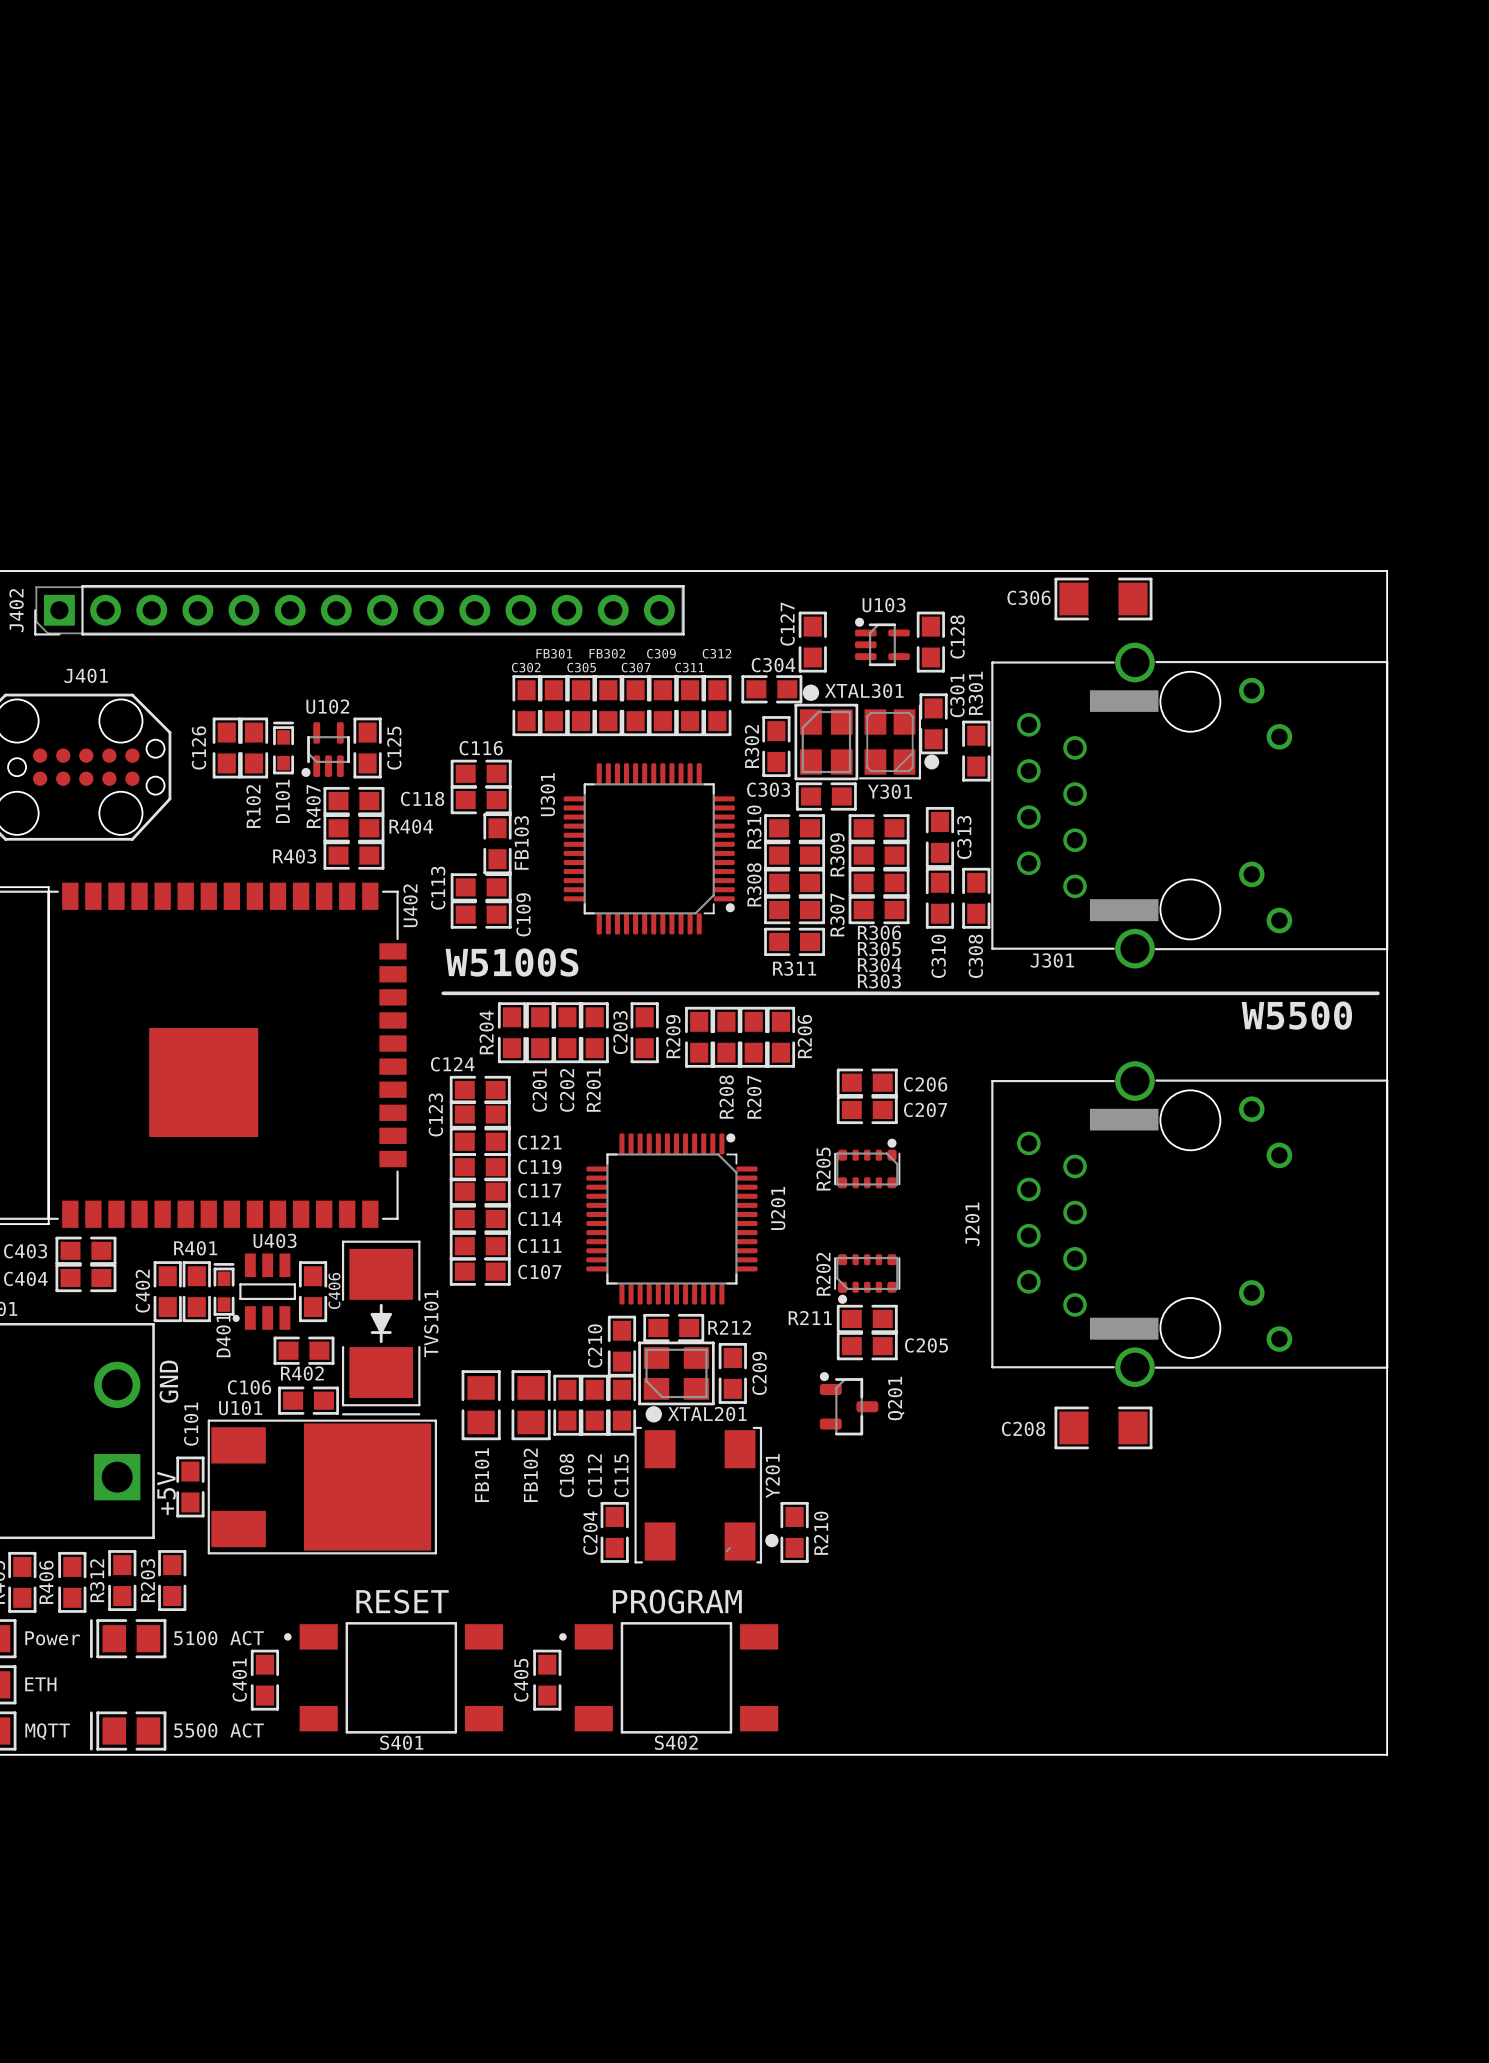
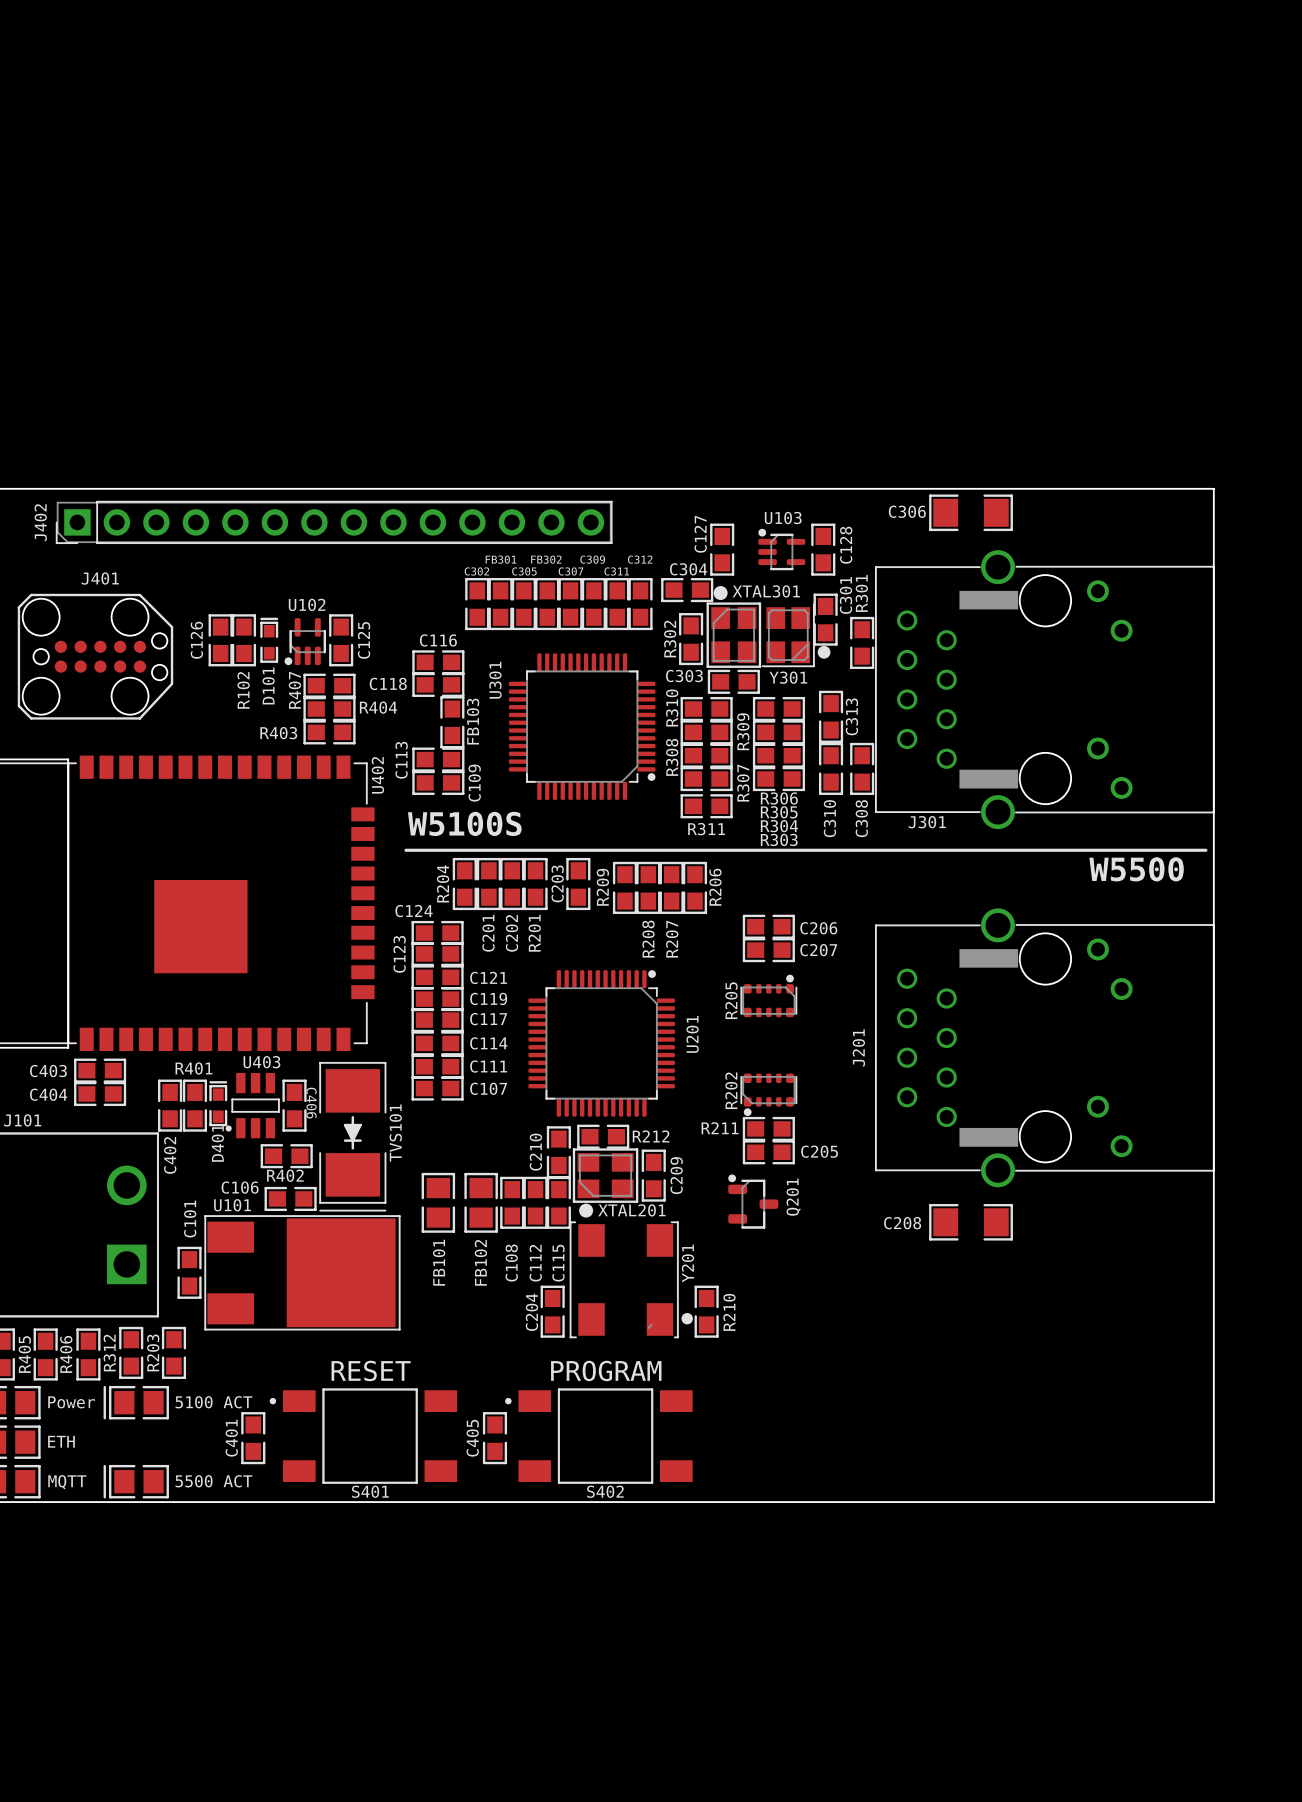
C406 name rotation: 0° (334, 1290) -> 180° (311, 1103)
C402 name position: C402 (142, 1291) -> C402 (170, 1155)
text: GND (168, 1381) -> none
text: +5V (166, 1493) -> none

